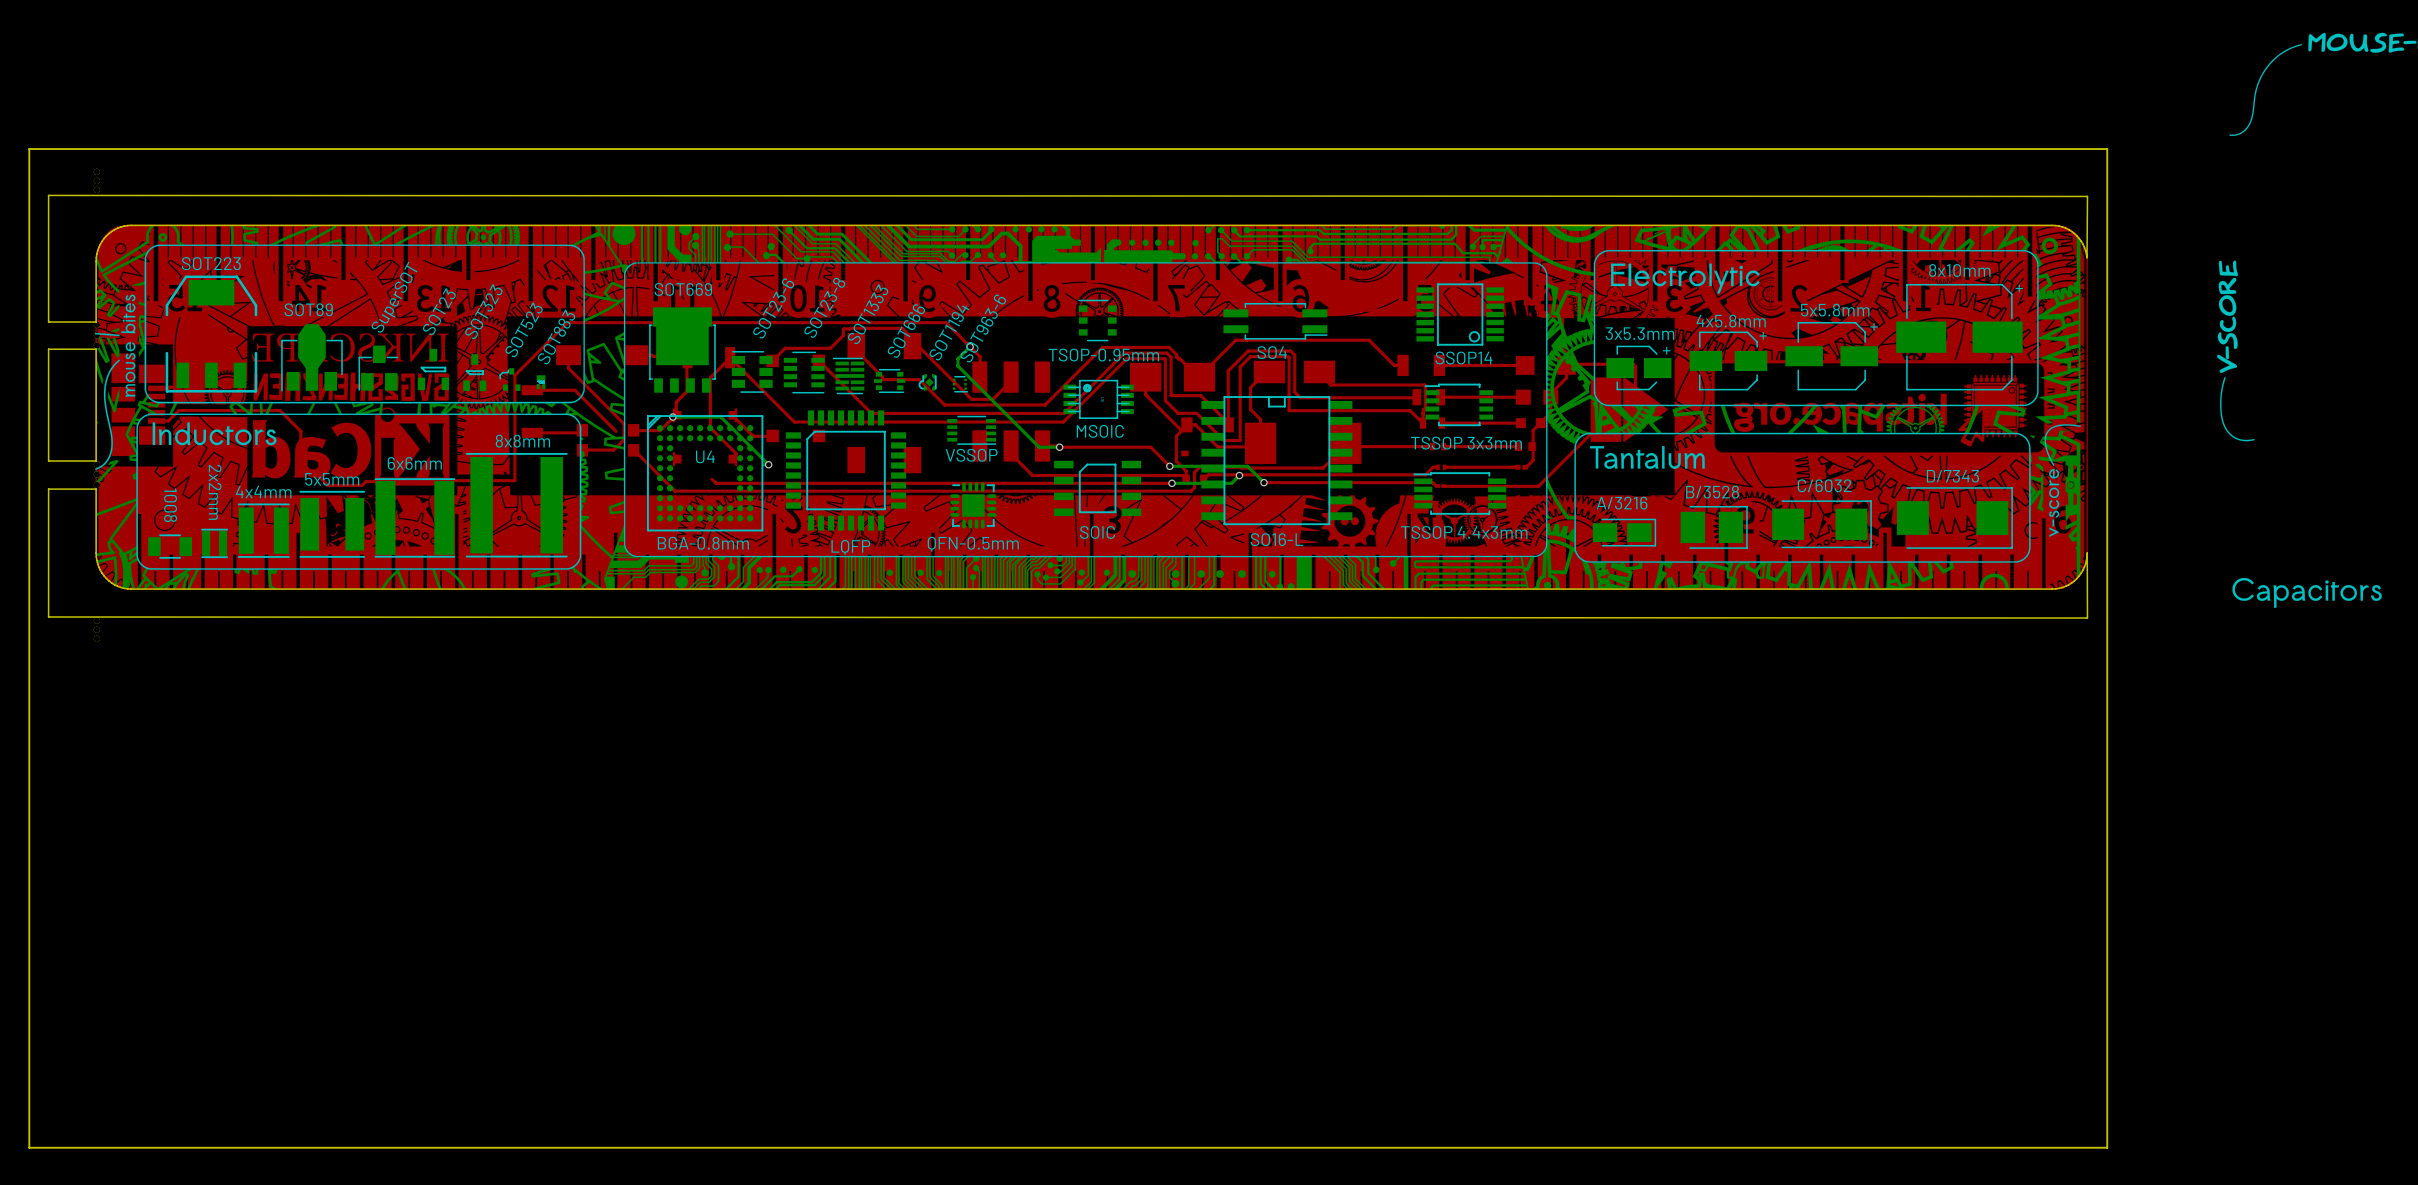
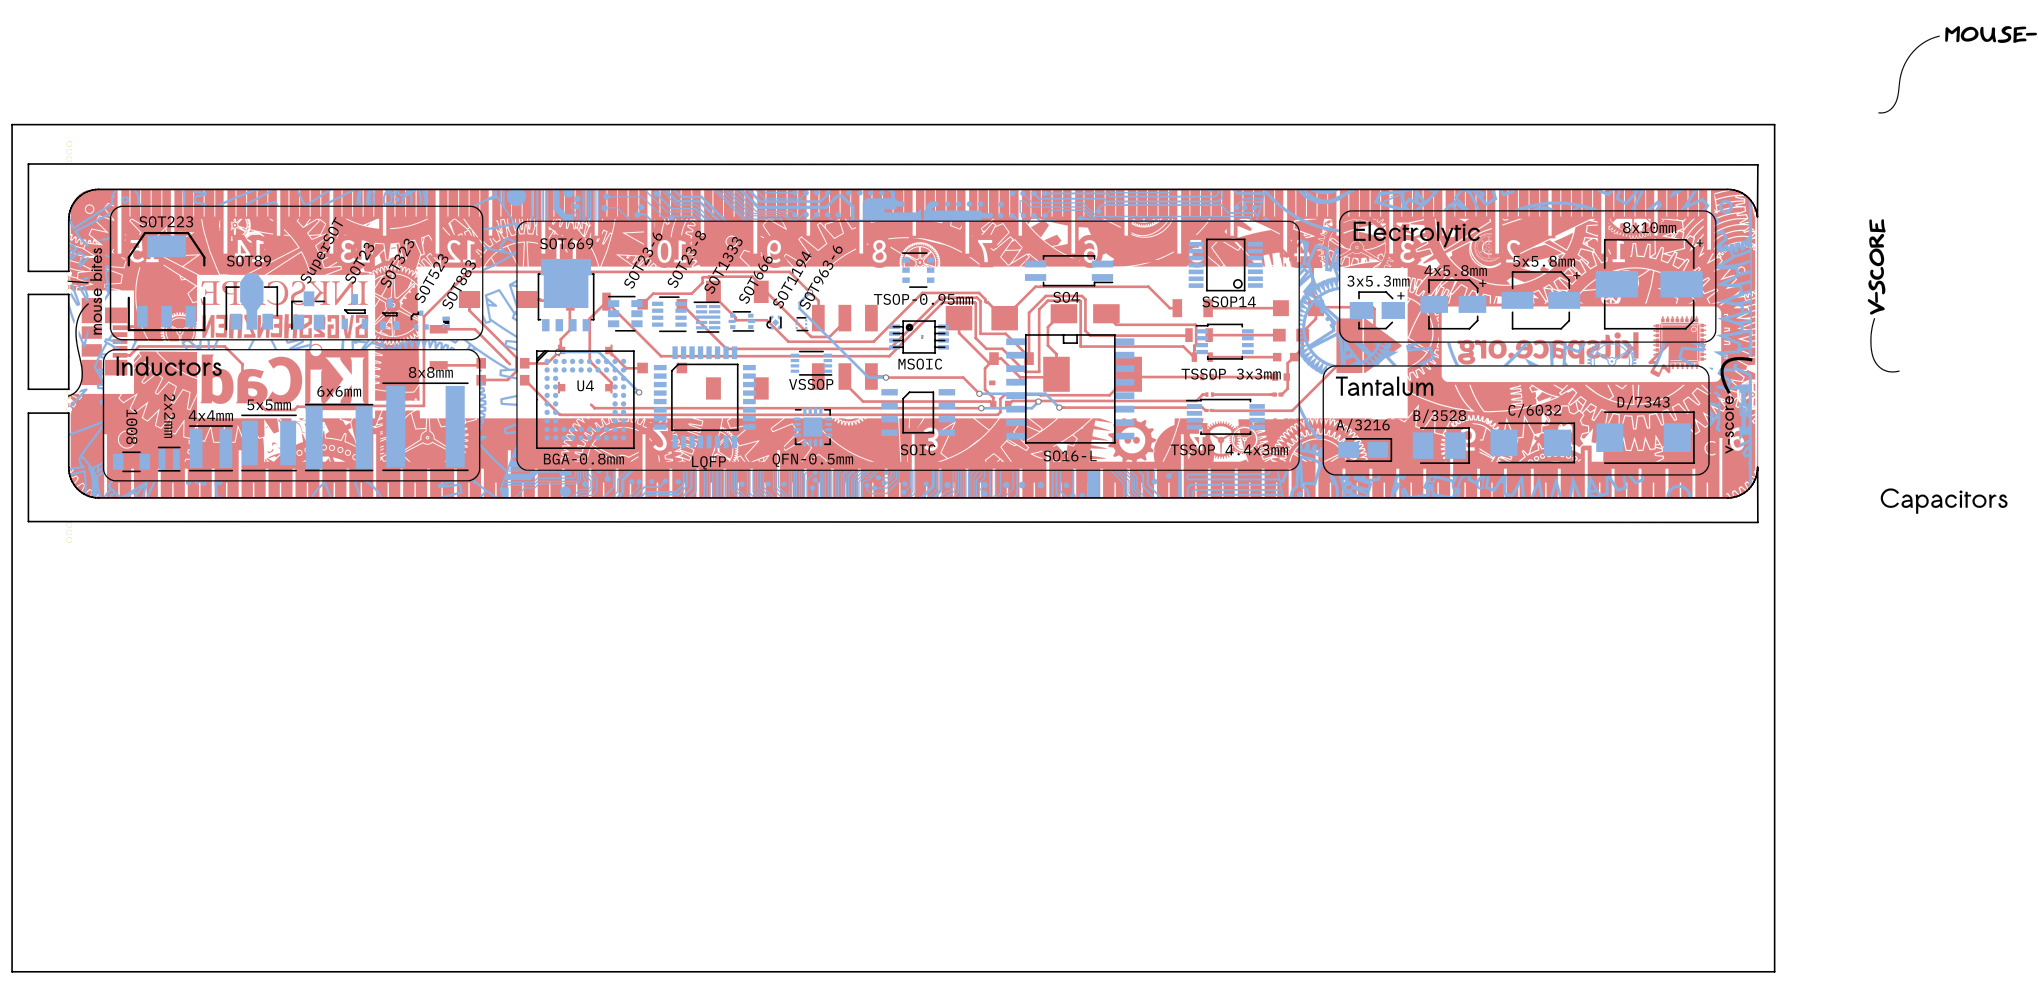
part footprint: [47, 168, 2089, 642] -> [27, 141, 1759, 543]

